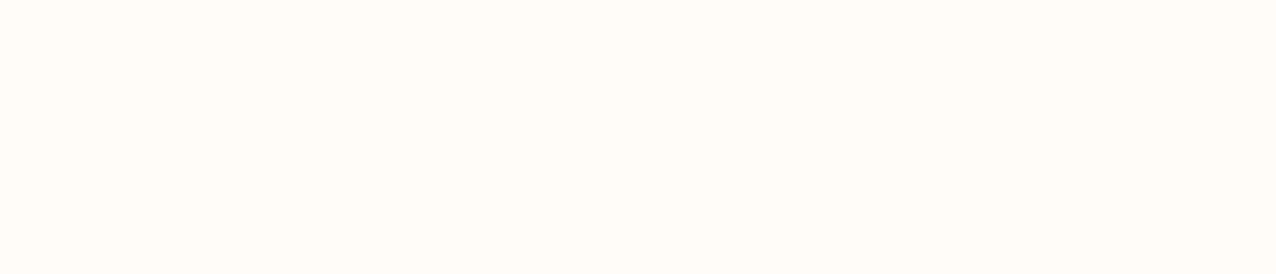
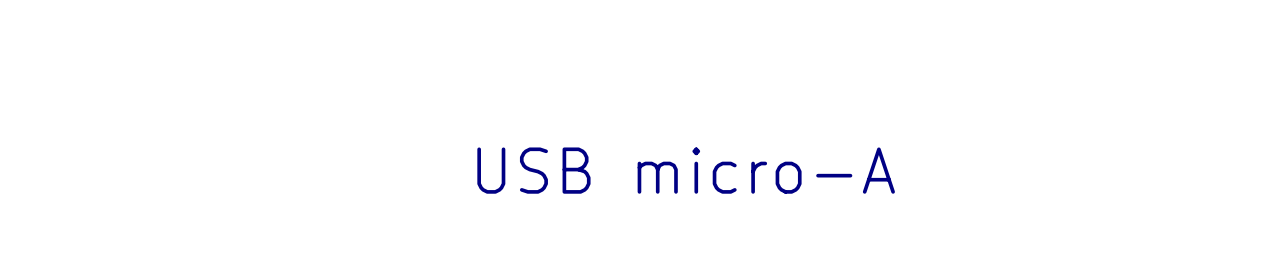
text: none -> USB micro-A (686, 170)

